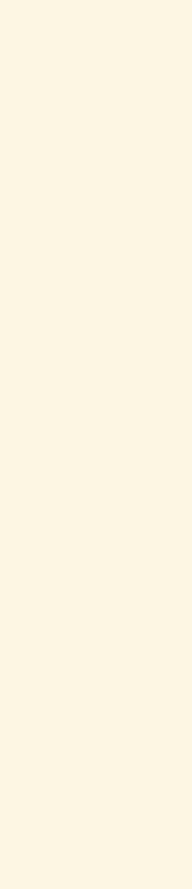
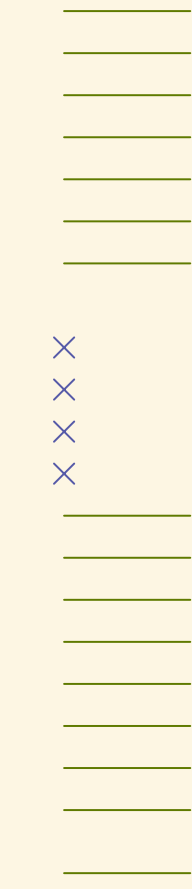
wire: none -> (64, 11) (190, 11)
wire: none -> (64, 53) (190, 53)
wire: none -> (64, 95) (190, 95)
wire: none -> (64, 137) (190, 137)
wire: none -> (64, 179) (190, 179)
wire: none -> (64, 221) (190, 221)
wire: none -> (64, 263) (190, 263)
no-connect mark: none -> (64, 347)
no-connect mark: none -> (64, 389)
no-connect mark: none -> (64, 431)
no-connect mark: none -> (64, 473)
wire: none -> (64, 515) (190, 515)
wire: none -> (64, 557) (190, 557)
wire: none -> (64, 599) (190, 599)
wire: none -> (64, 641) (190, 641)
wire: none -> (64, 683) (190, 683)
wire: none -> (64, 725) (190, 725)
wire: none -> (64, 768) (190, 768)
wire: none -> (64, 810) (190, 810)
wire: none -> (64, 873) (190, 873)

